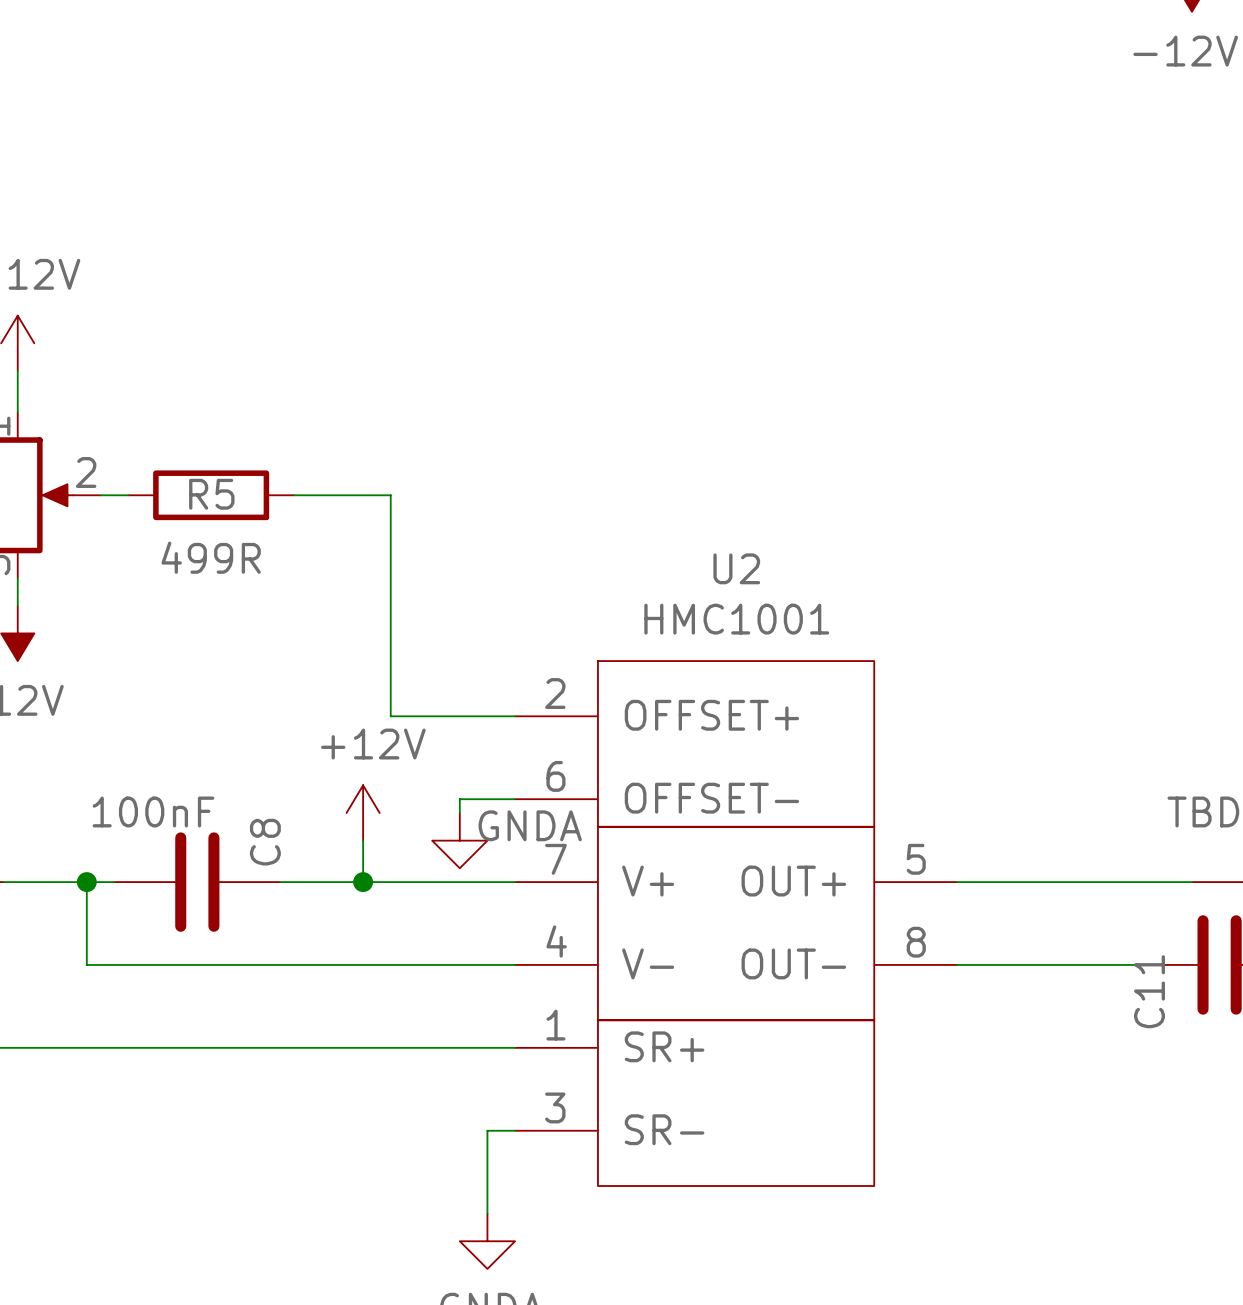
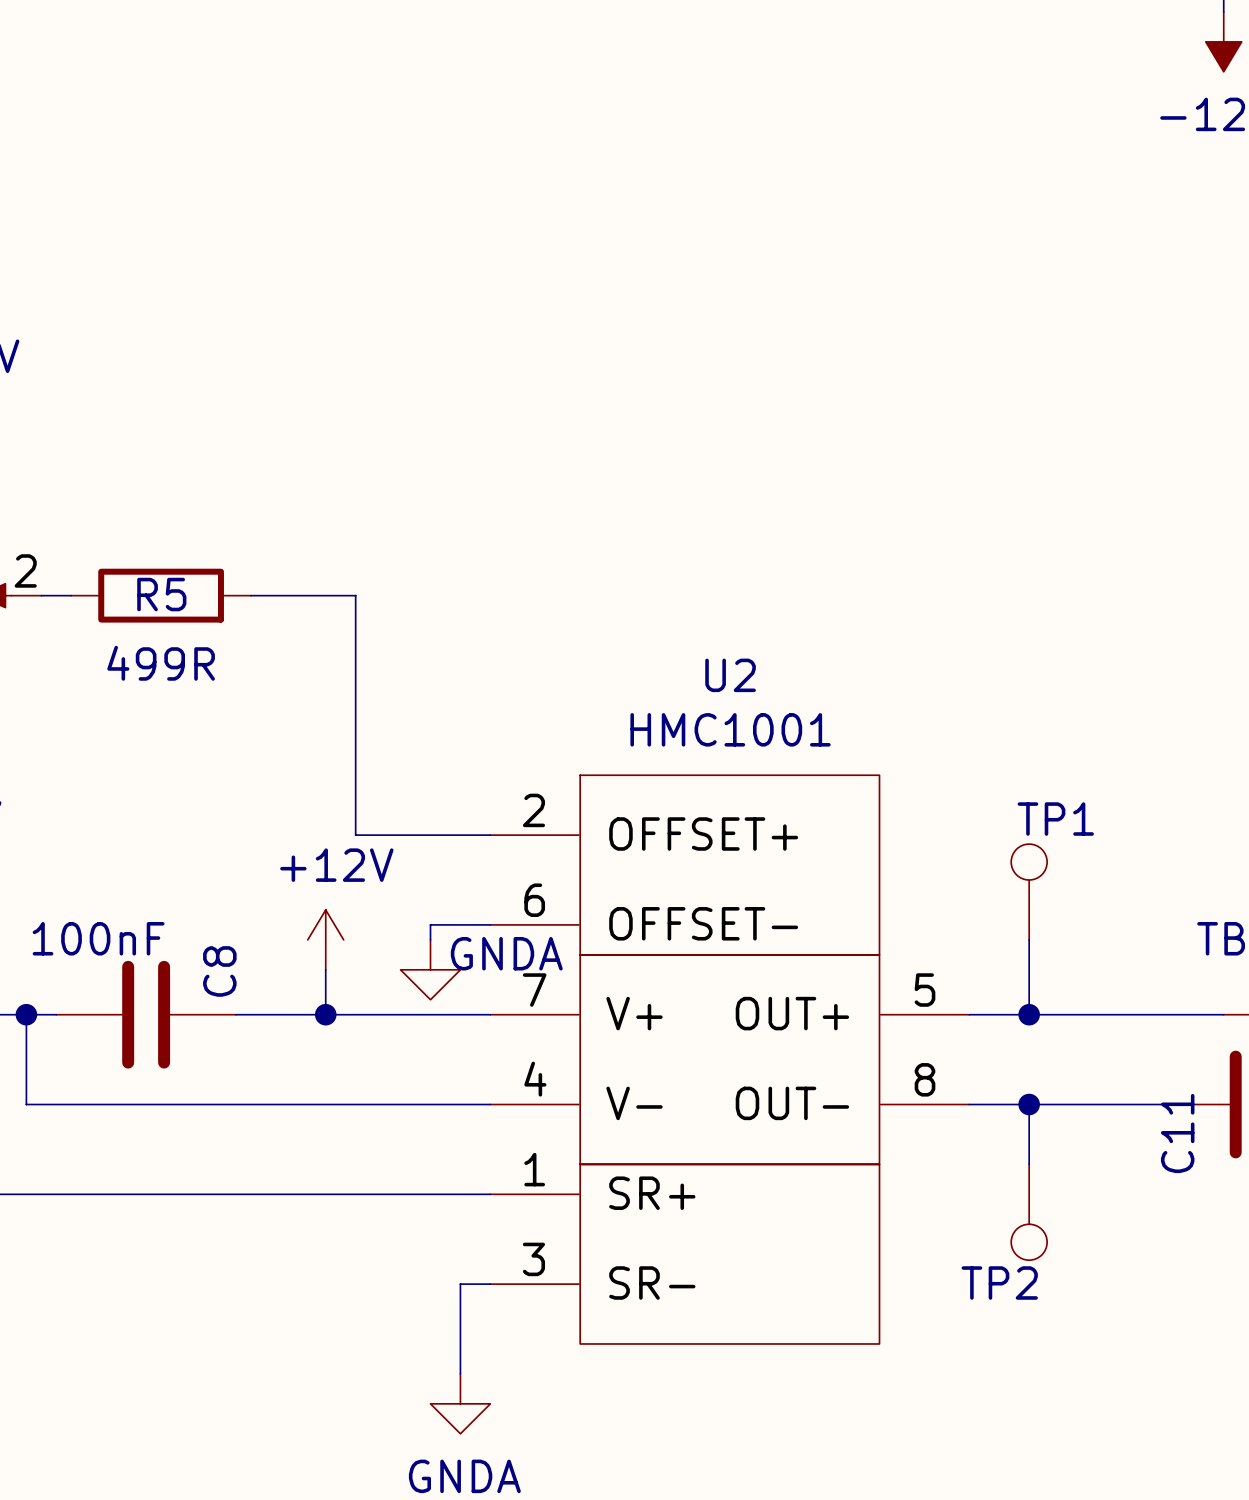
TP1: none -> (1029, 891)
wire: none -> (1029, 939) (1029, 1014)
junction: none -> (1029, 1014)
wire: none -> (1029, 1104) (1029, 1164)
junction: none -> (1029, 1104)
TP2: none -> (1029, 1212)

